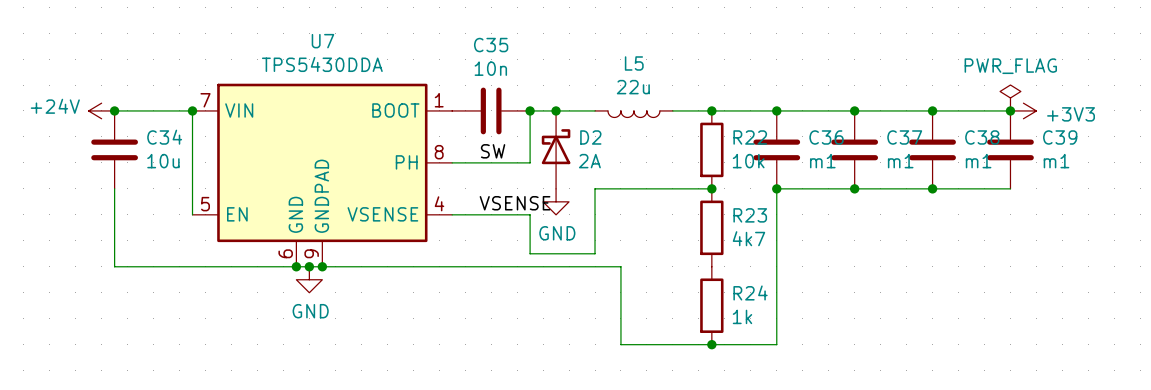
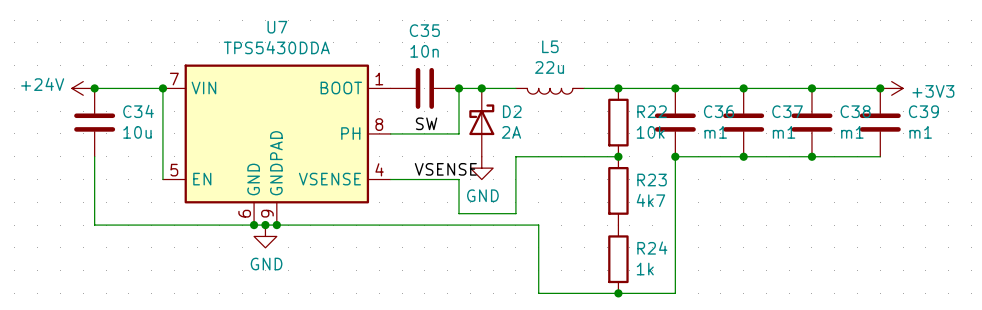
power symbol: PWR_FLAG (1010, 97) -> none

